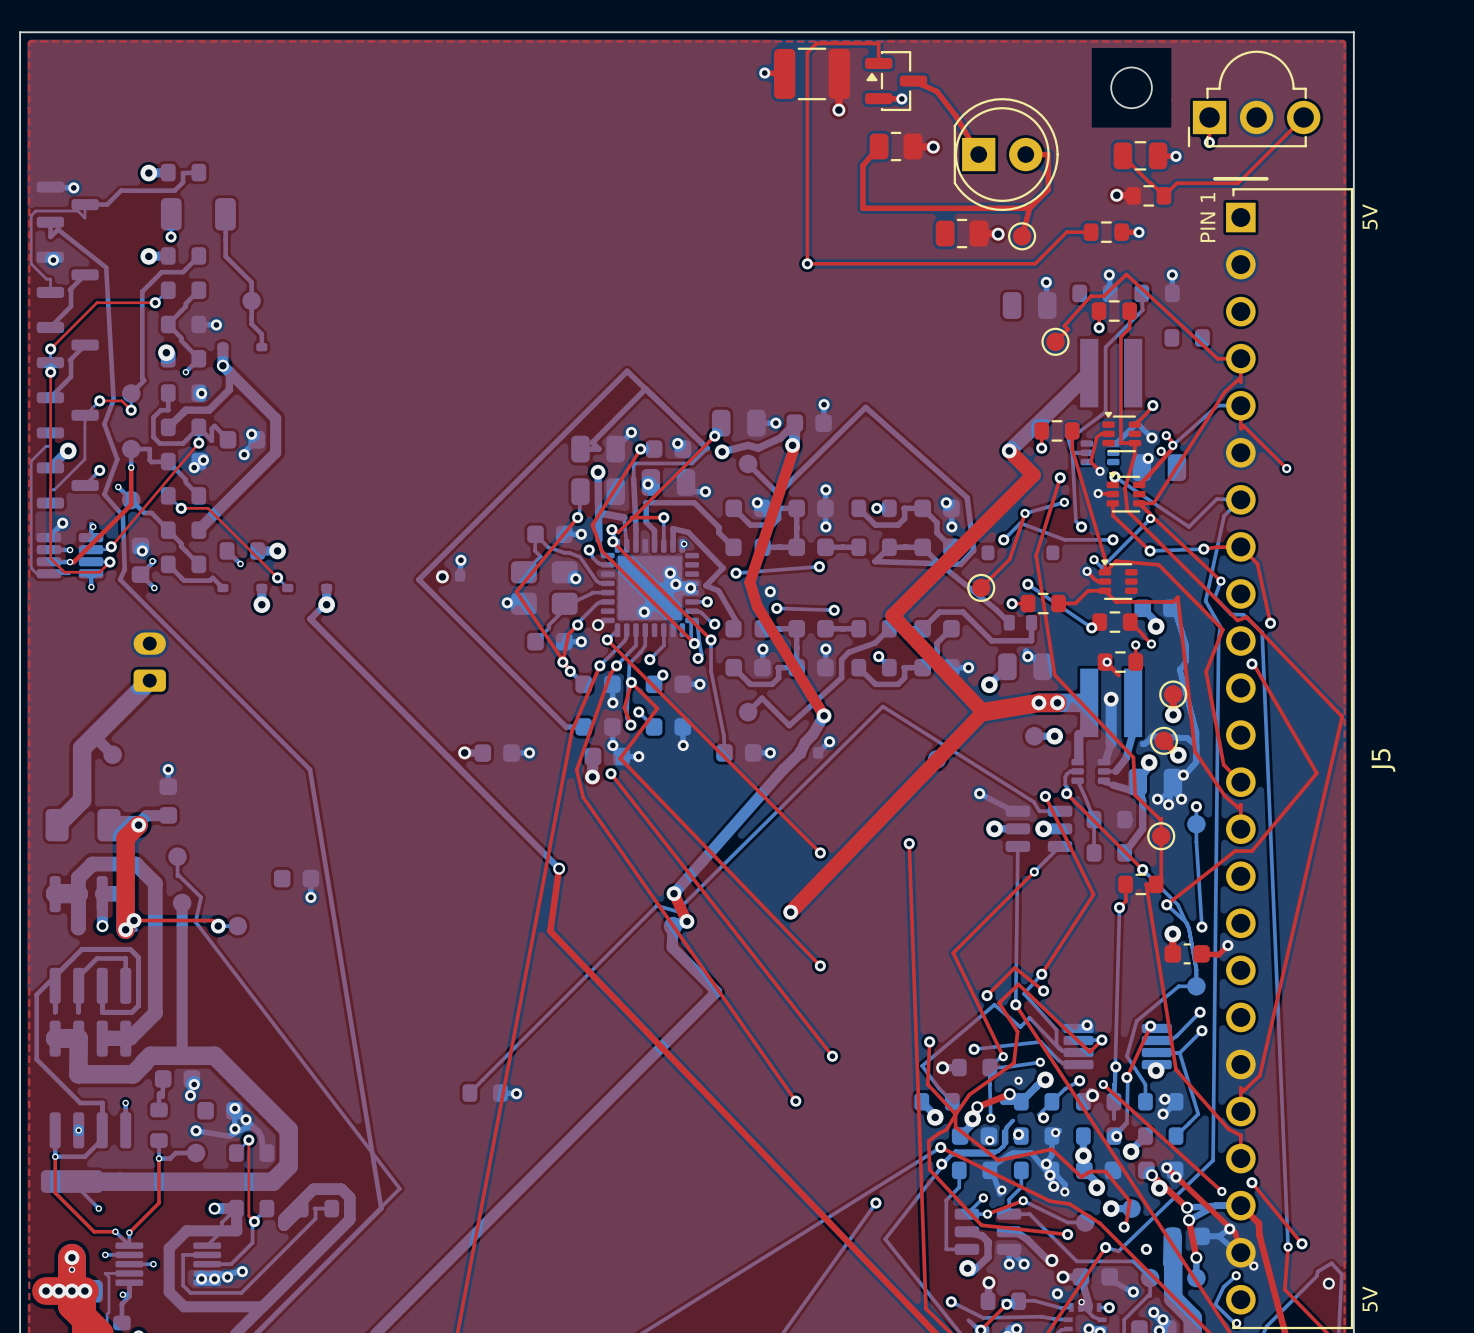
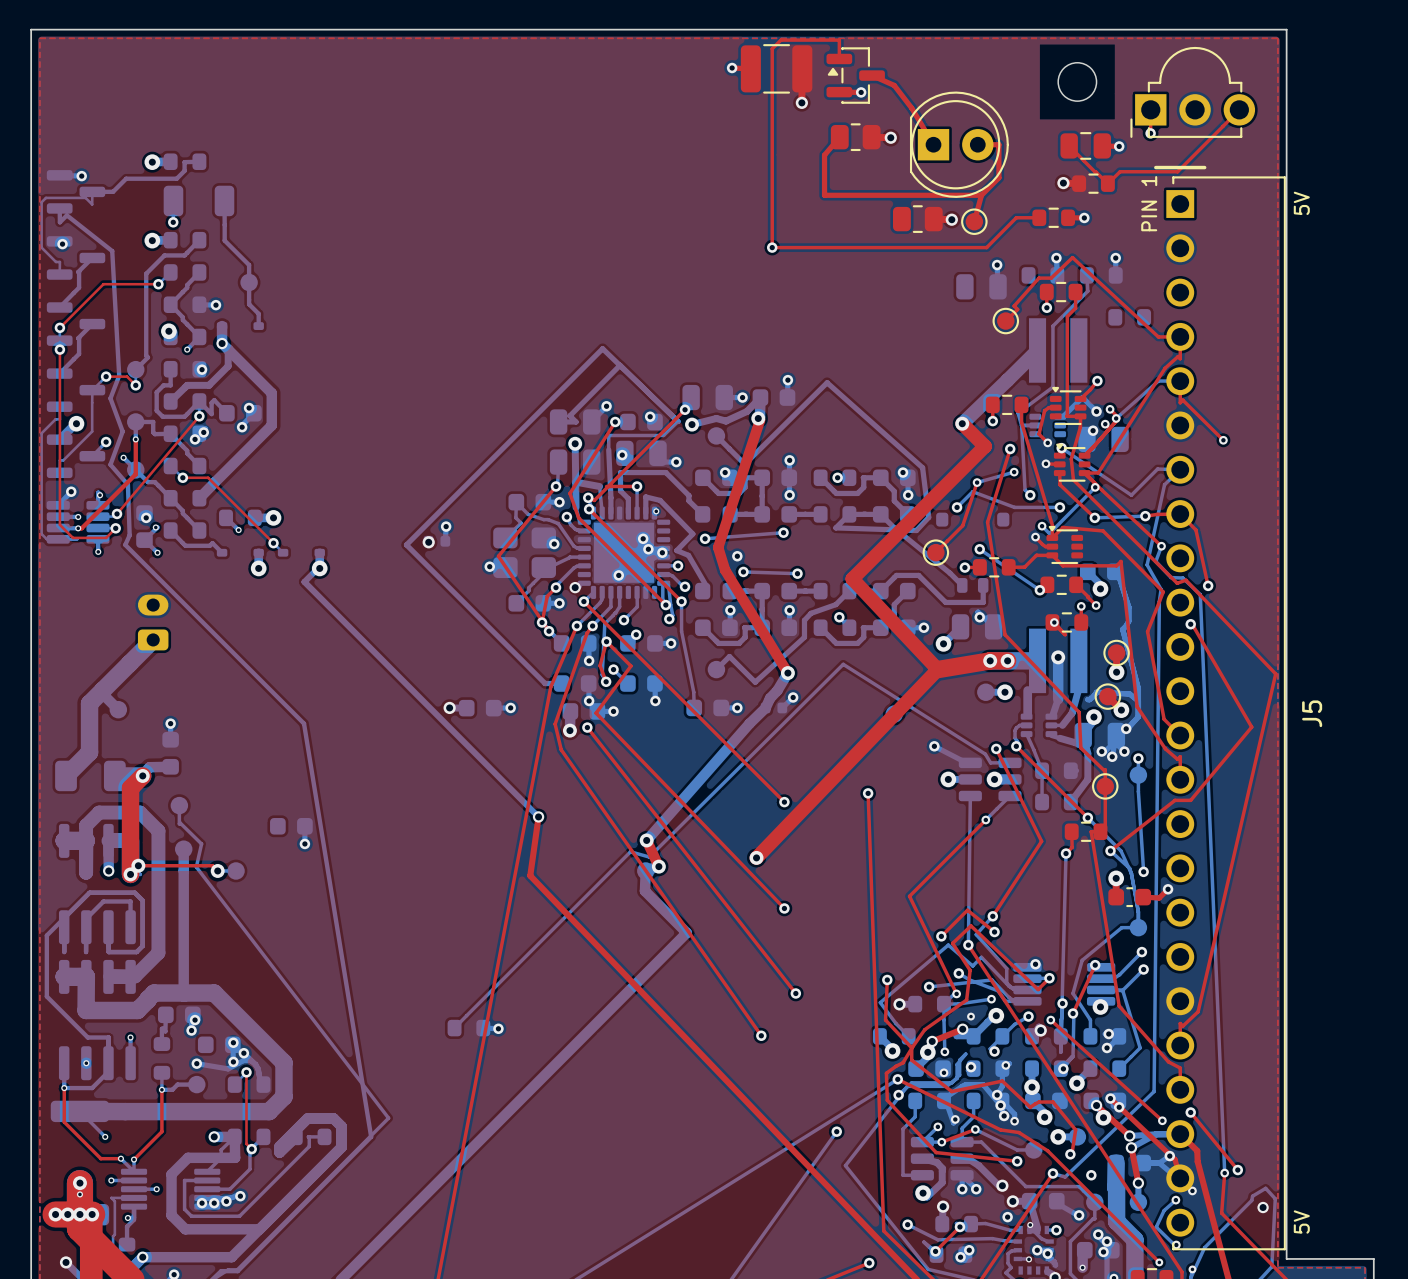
bottom track: none -> (958, 973) (969, 979) (998, 990) (1005, 1001) (1027, 1001)
via: none -> (958, 973)

